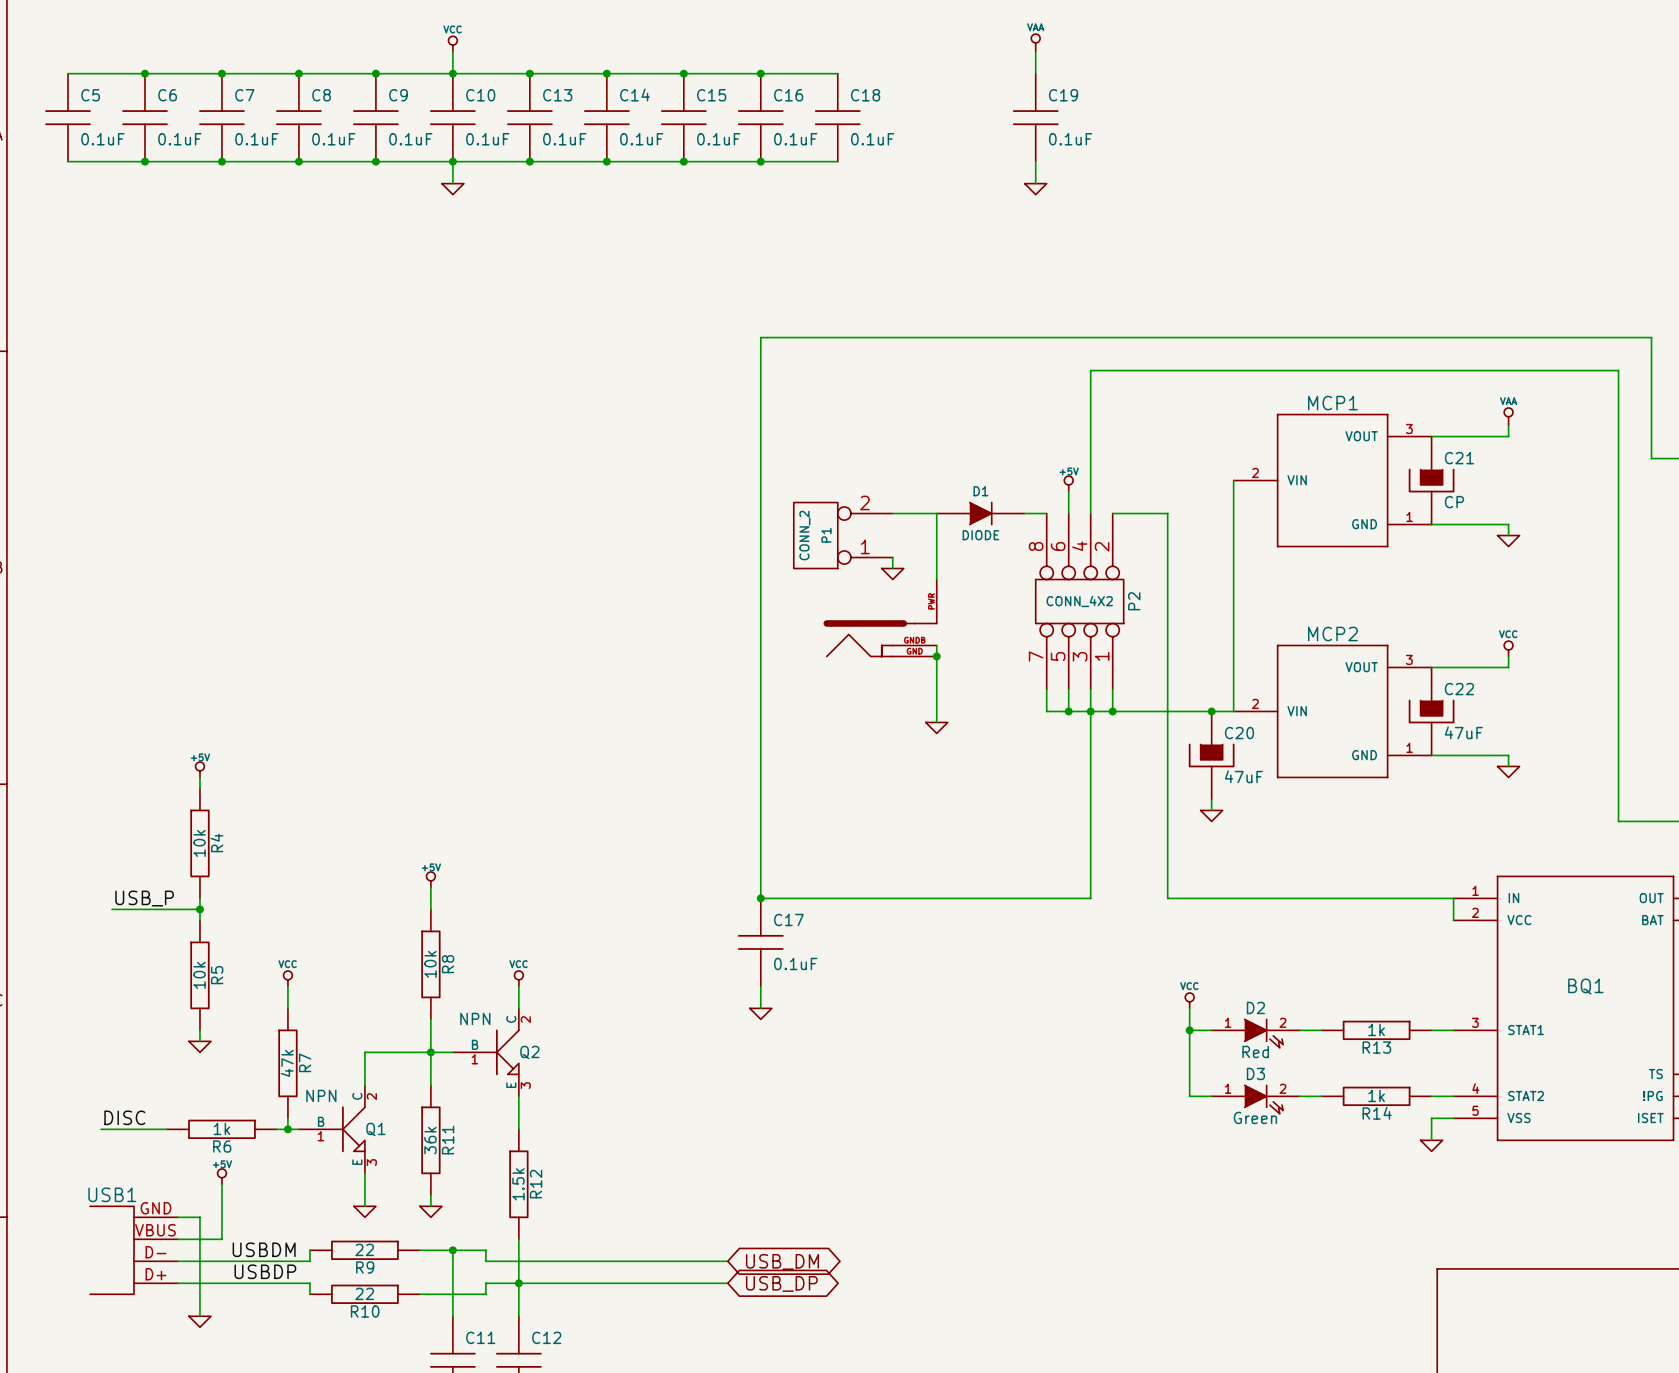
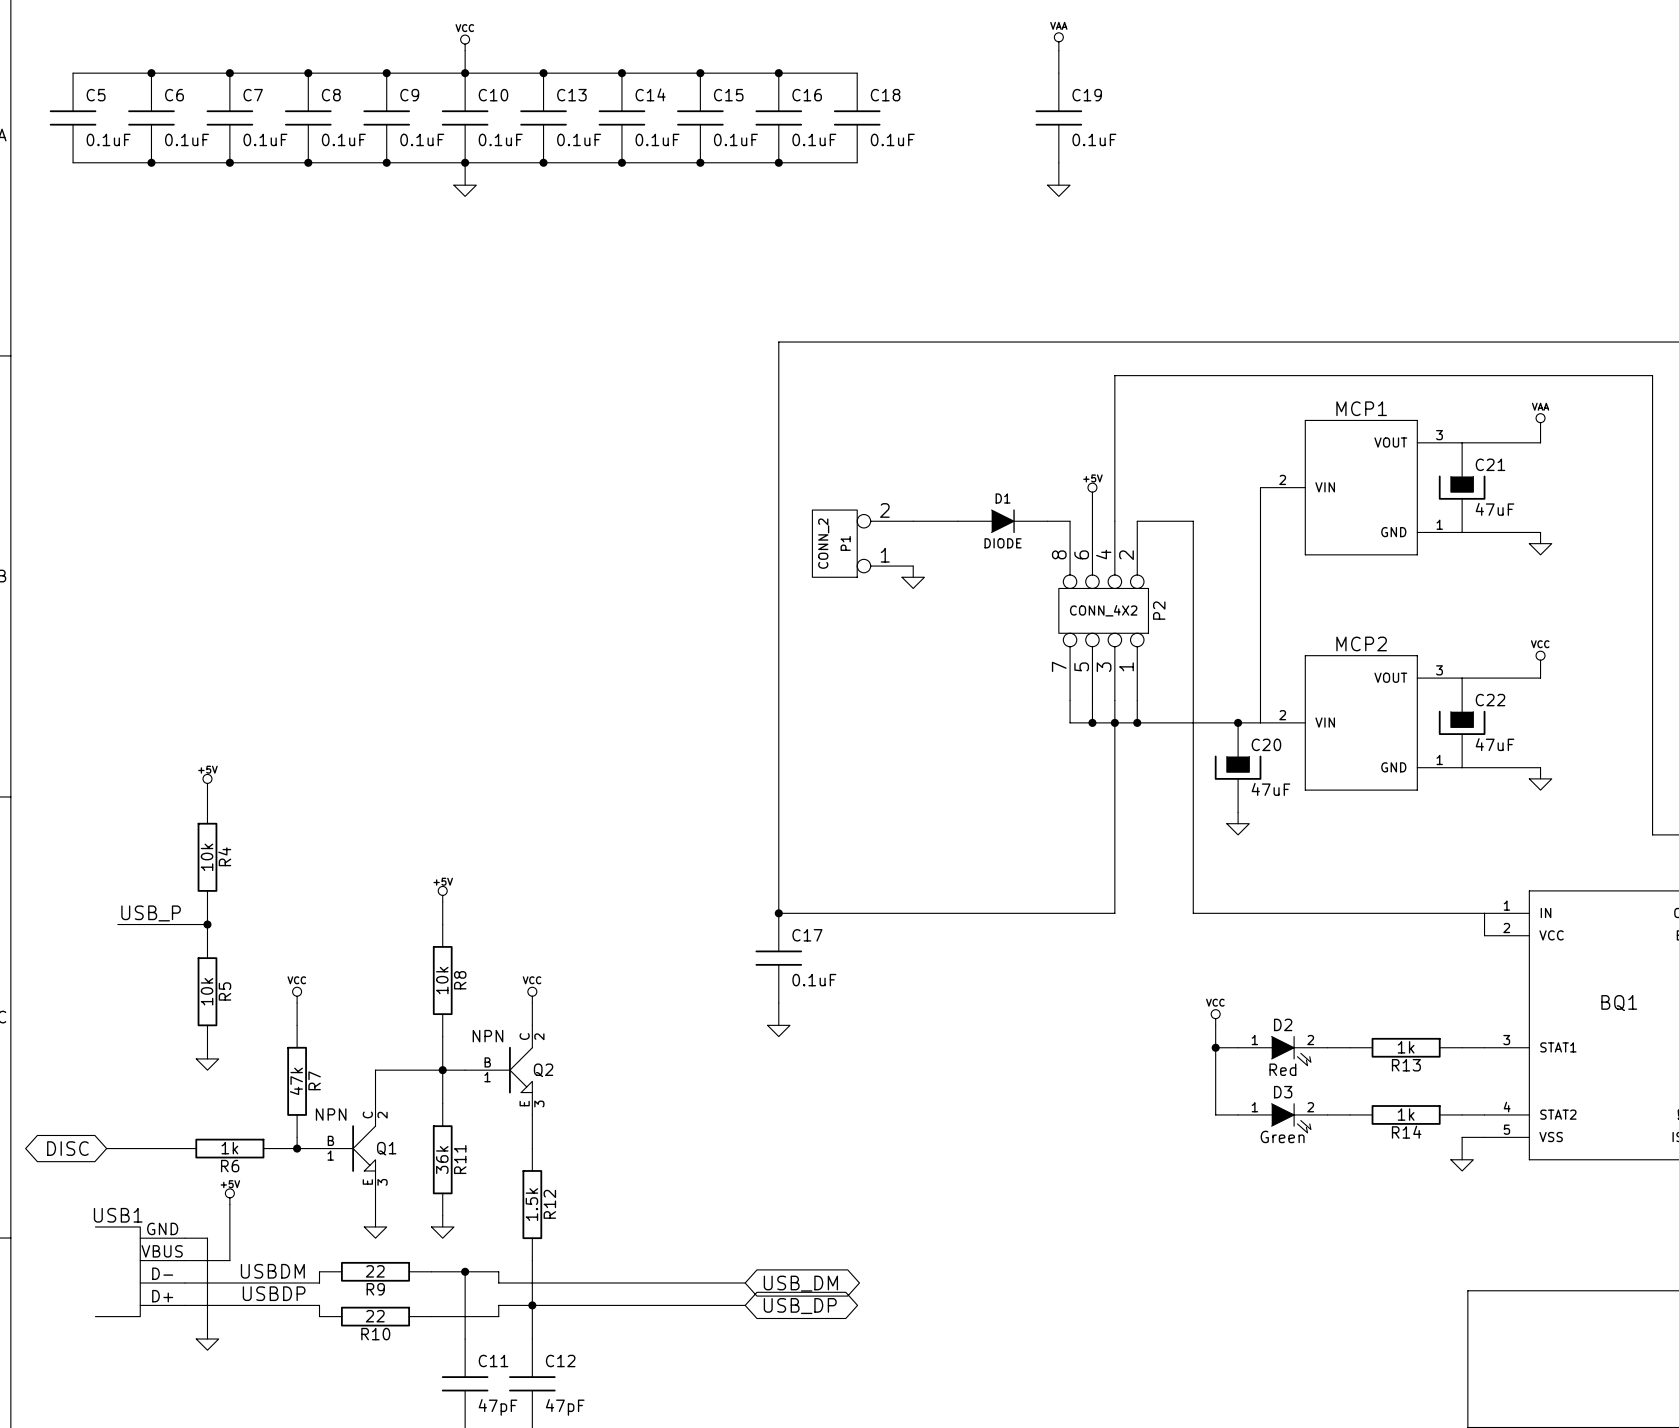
C21 value: CP (1454, 502) -> 47uF (1495, 509)
wire: (936, 513) (936, 579) -> none
part: (880, 618) -> none
wire: (936, 645) (936, 722) -> none
junction: (936, 656) -> none
power symbol: (936, 727) -> none
label: DISC (124, 1117) -> none
global label: none -> DISC (67, 1148)

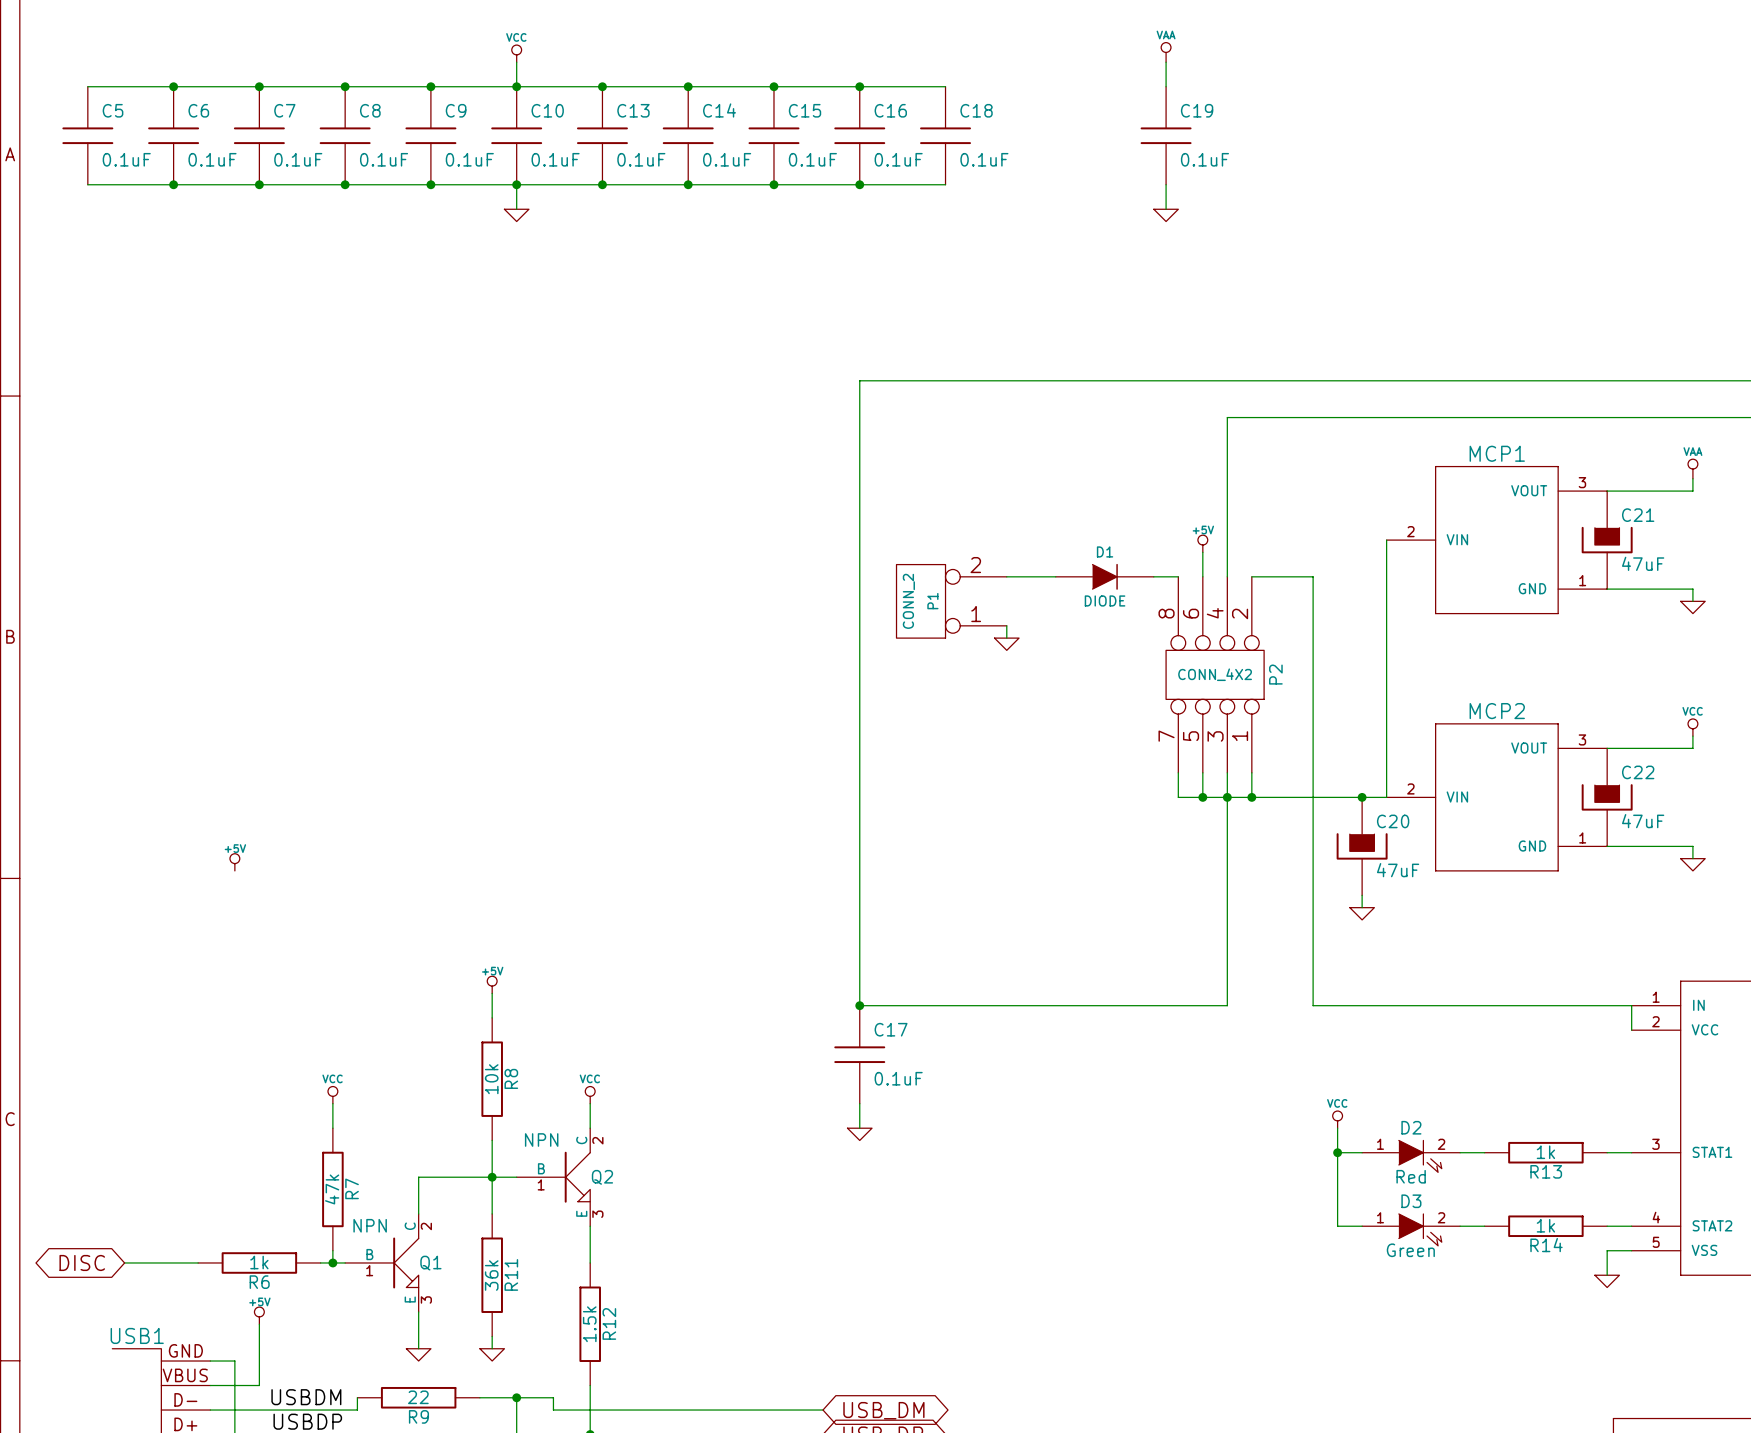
wire: (207, 790) (207, 801) -> none
R4: 10k (207, 857) -> none
label: USB_P (151, 913) -> none
wire: (207, 913) (207, 935) -> none
wire: (117, 924) (207, 924) -> none
junction: (207, 924) -> none
R5: 10k (207, 991) -> none
wire: (207, 1047) (207, 1058) -> none
power symbol: (207, 1064) -> none

